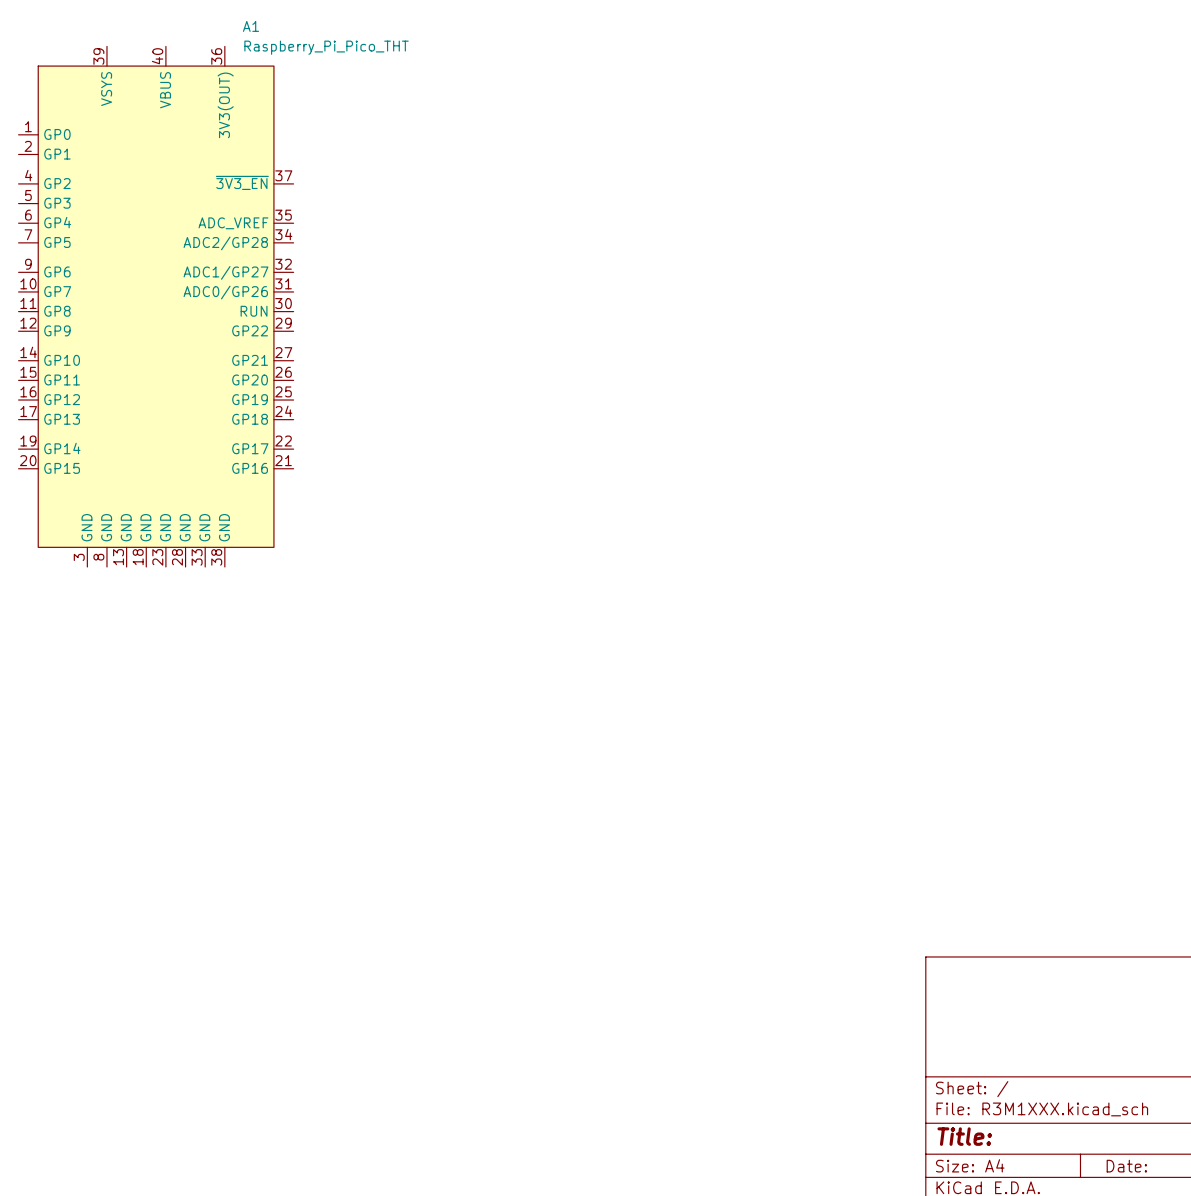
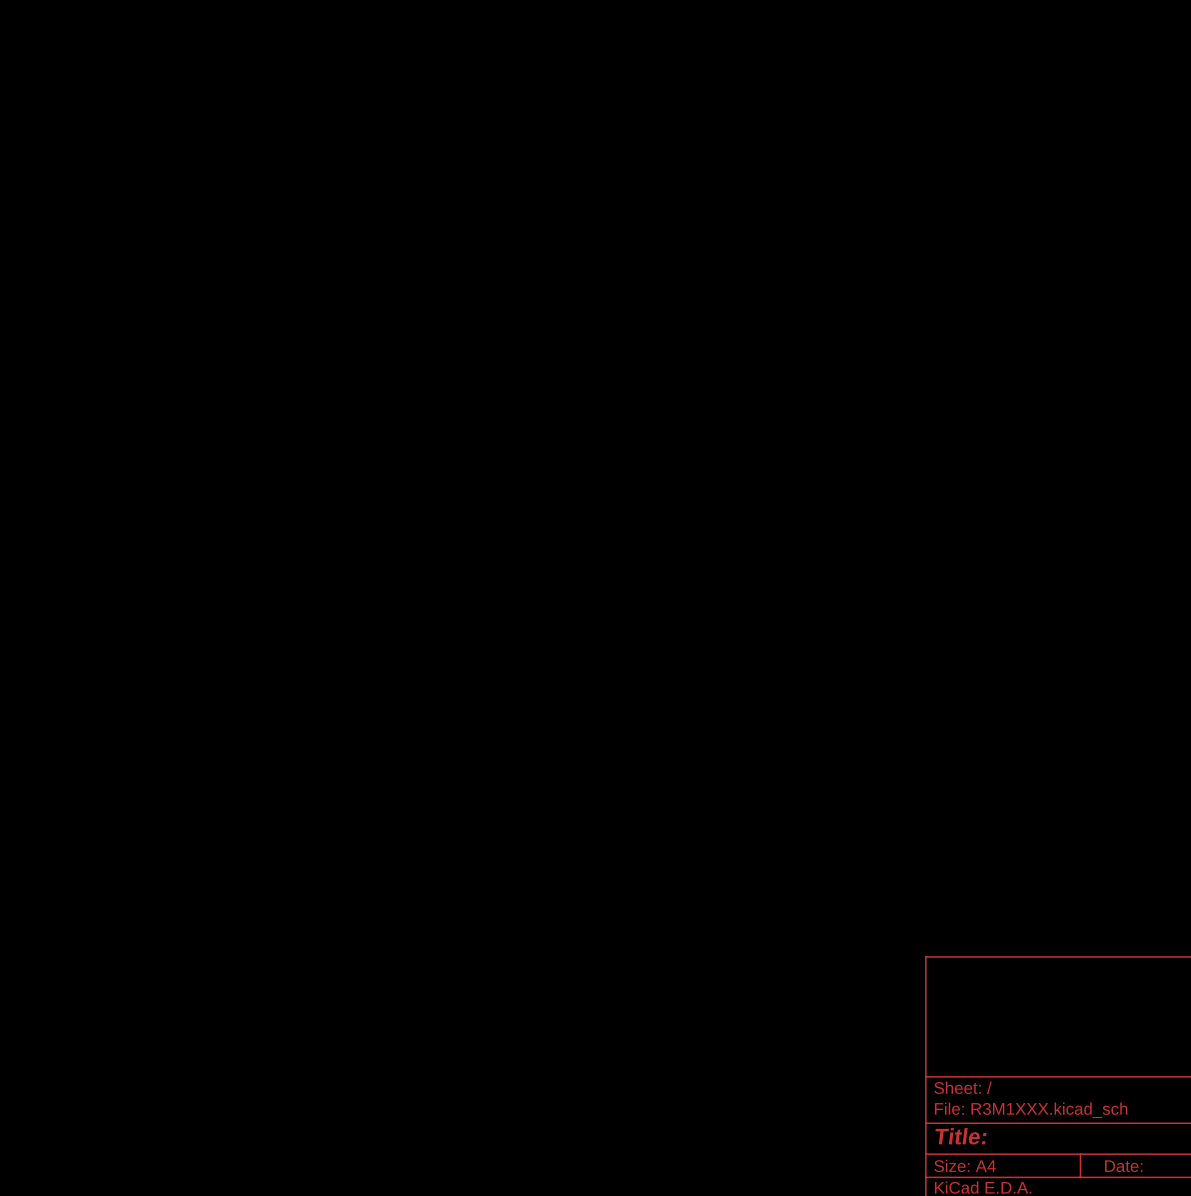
A1: Raspberry_Pi_Pico_THT (156, 306) -> none

